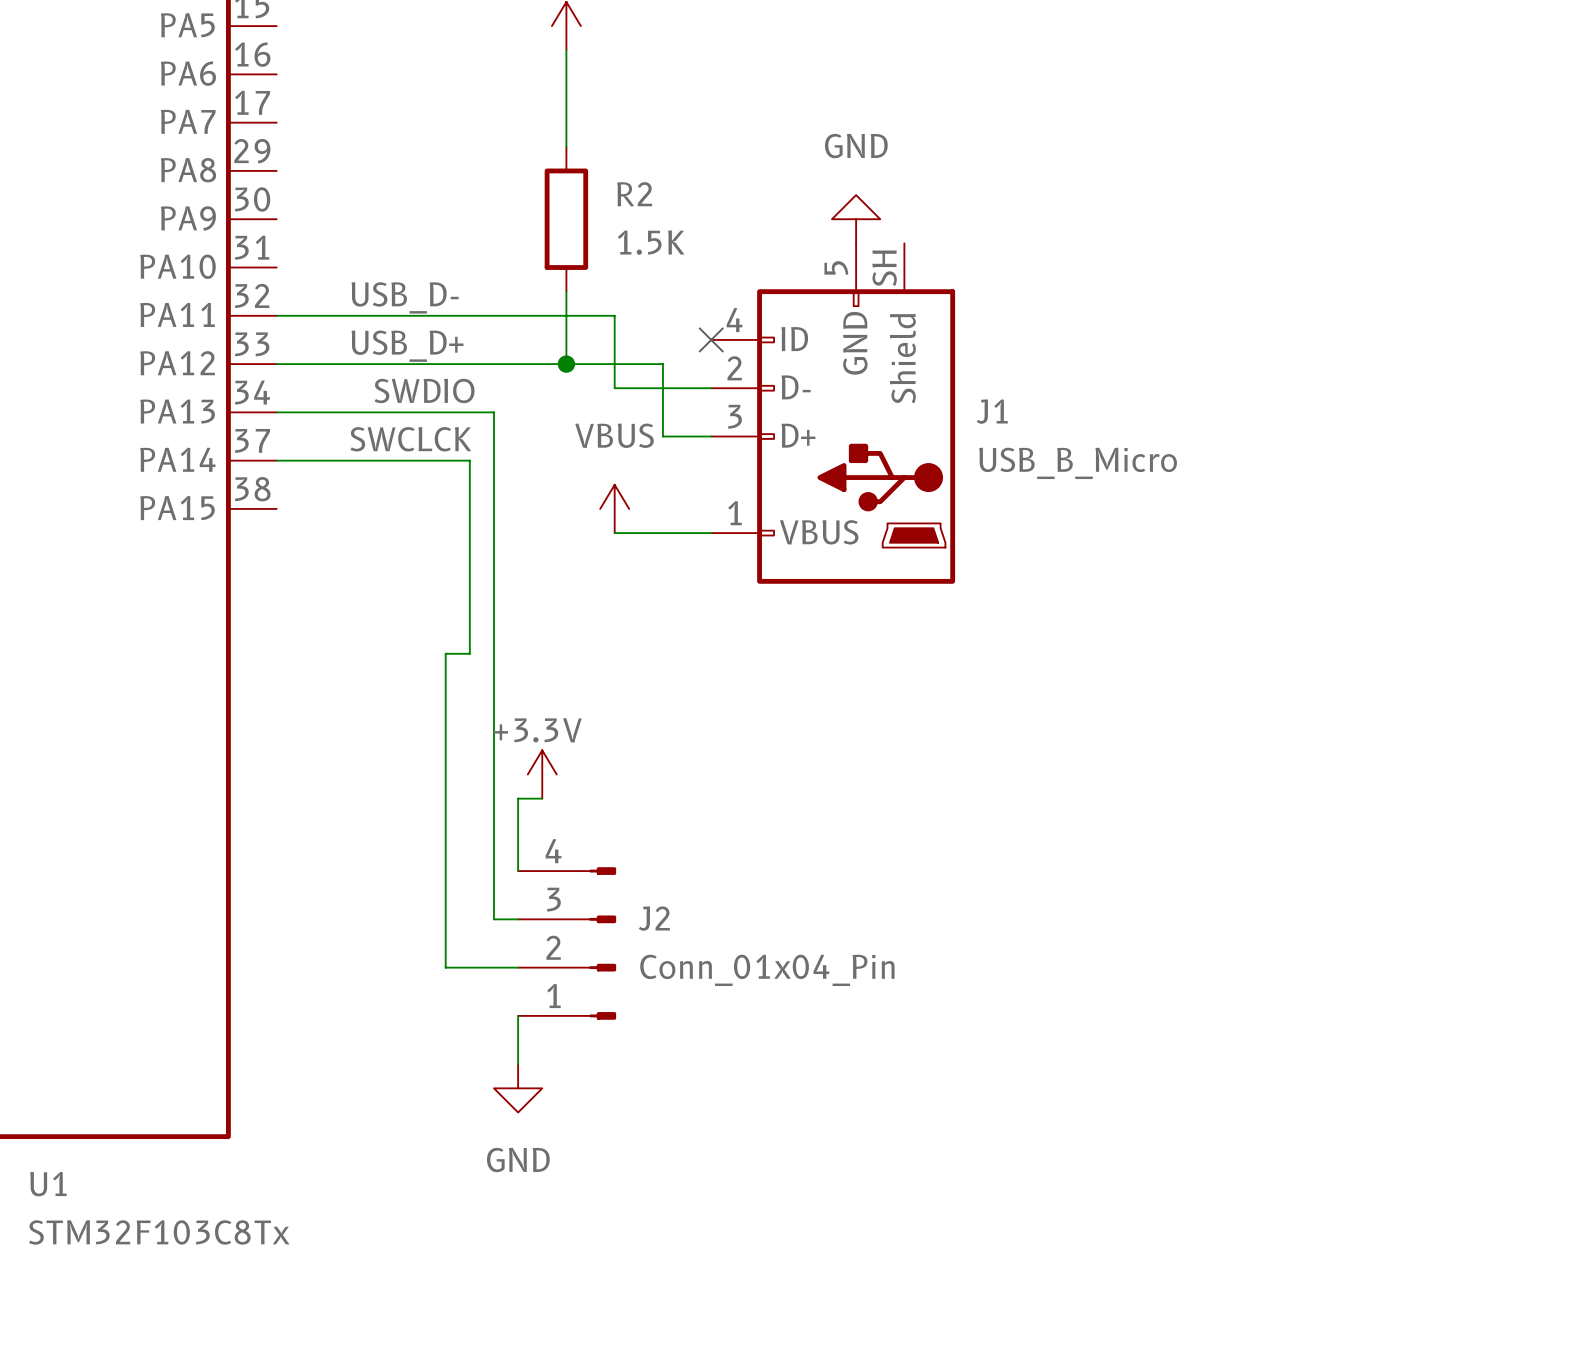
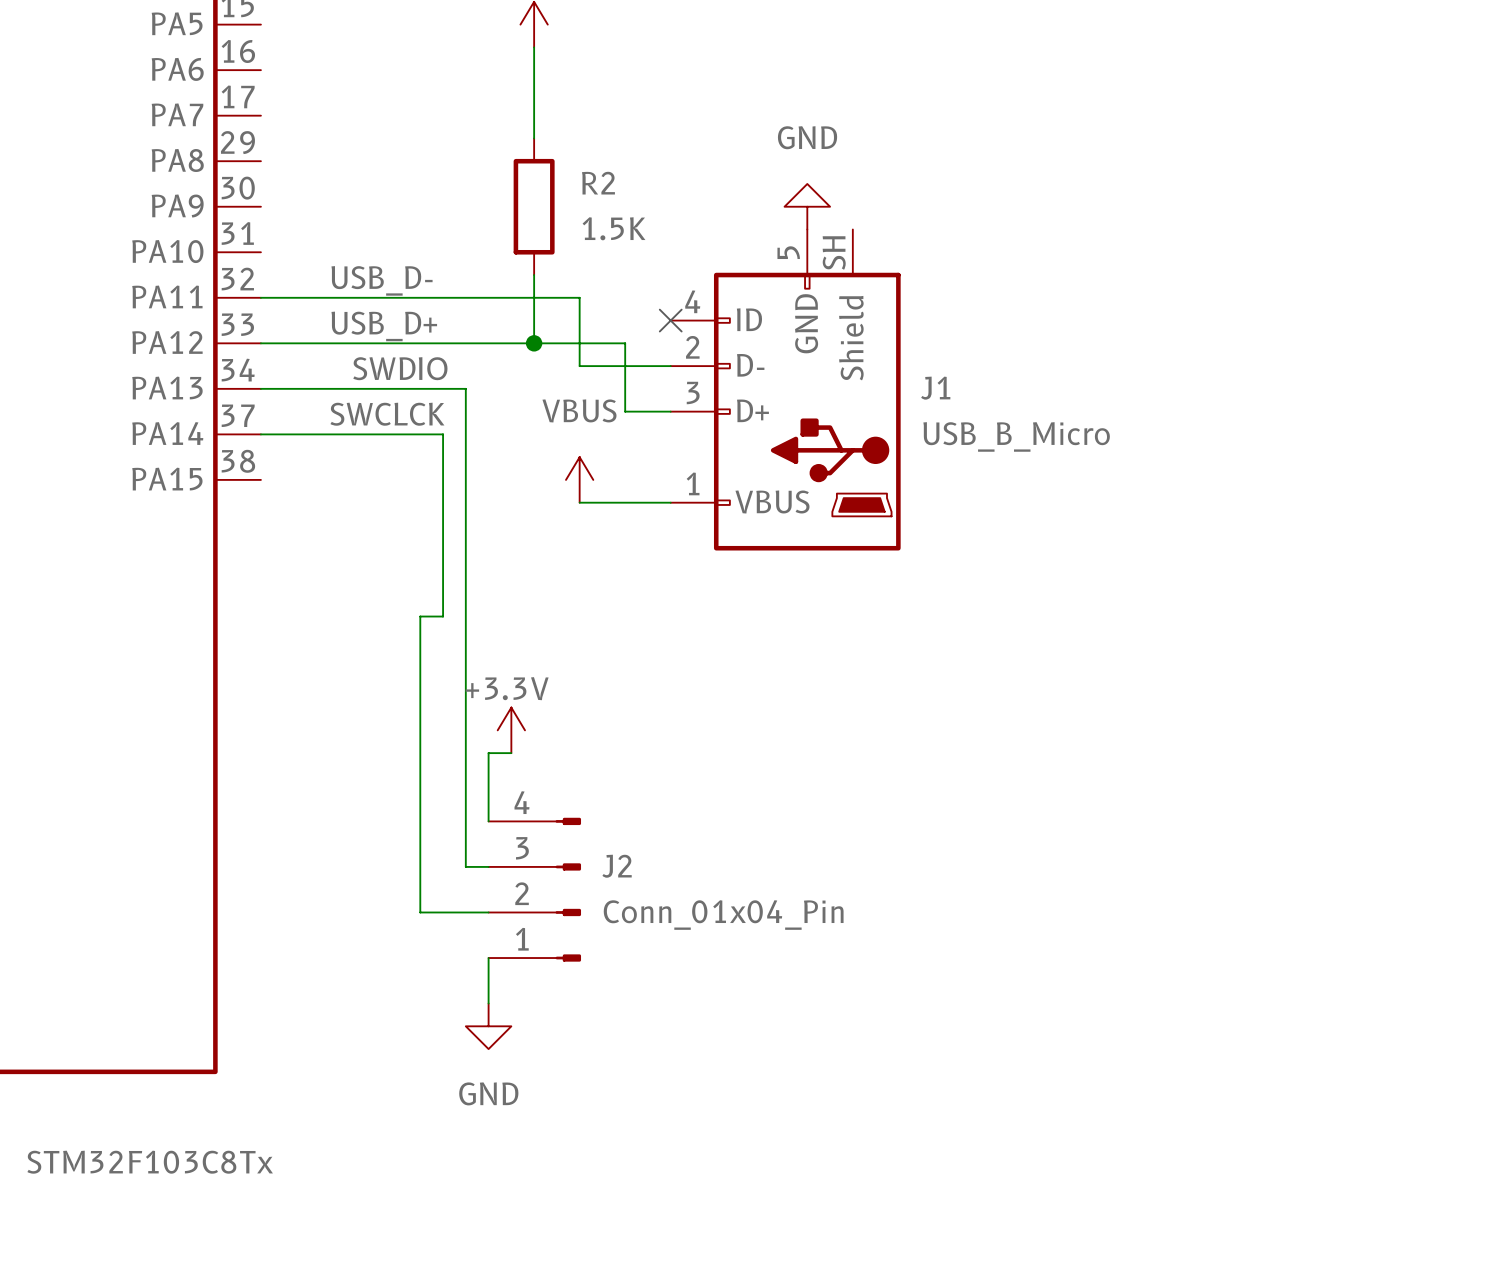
U1 name: U1 (48, 1184) -> none

